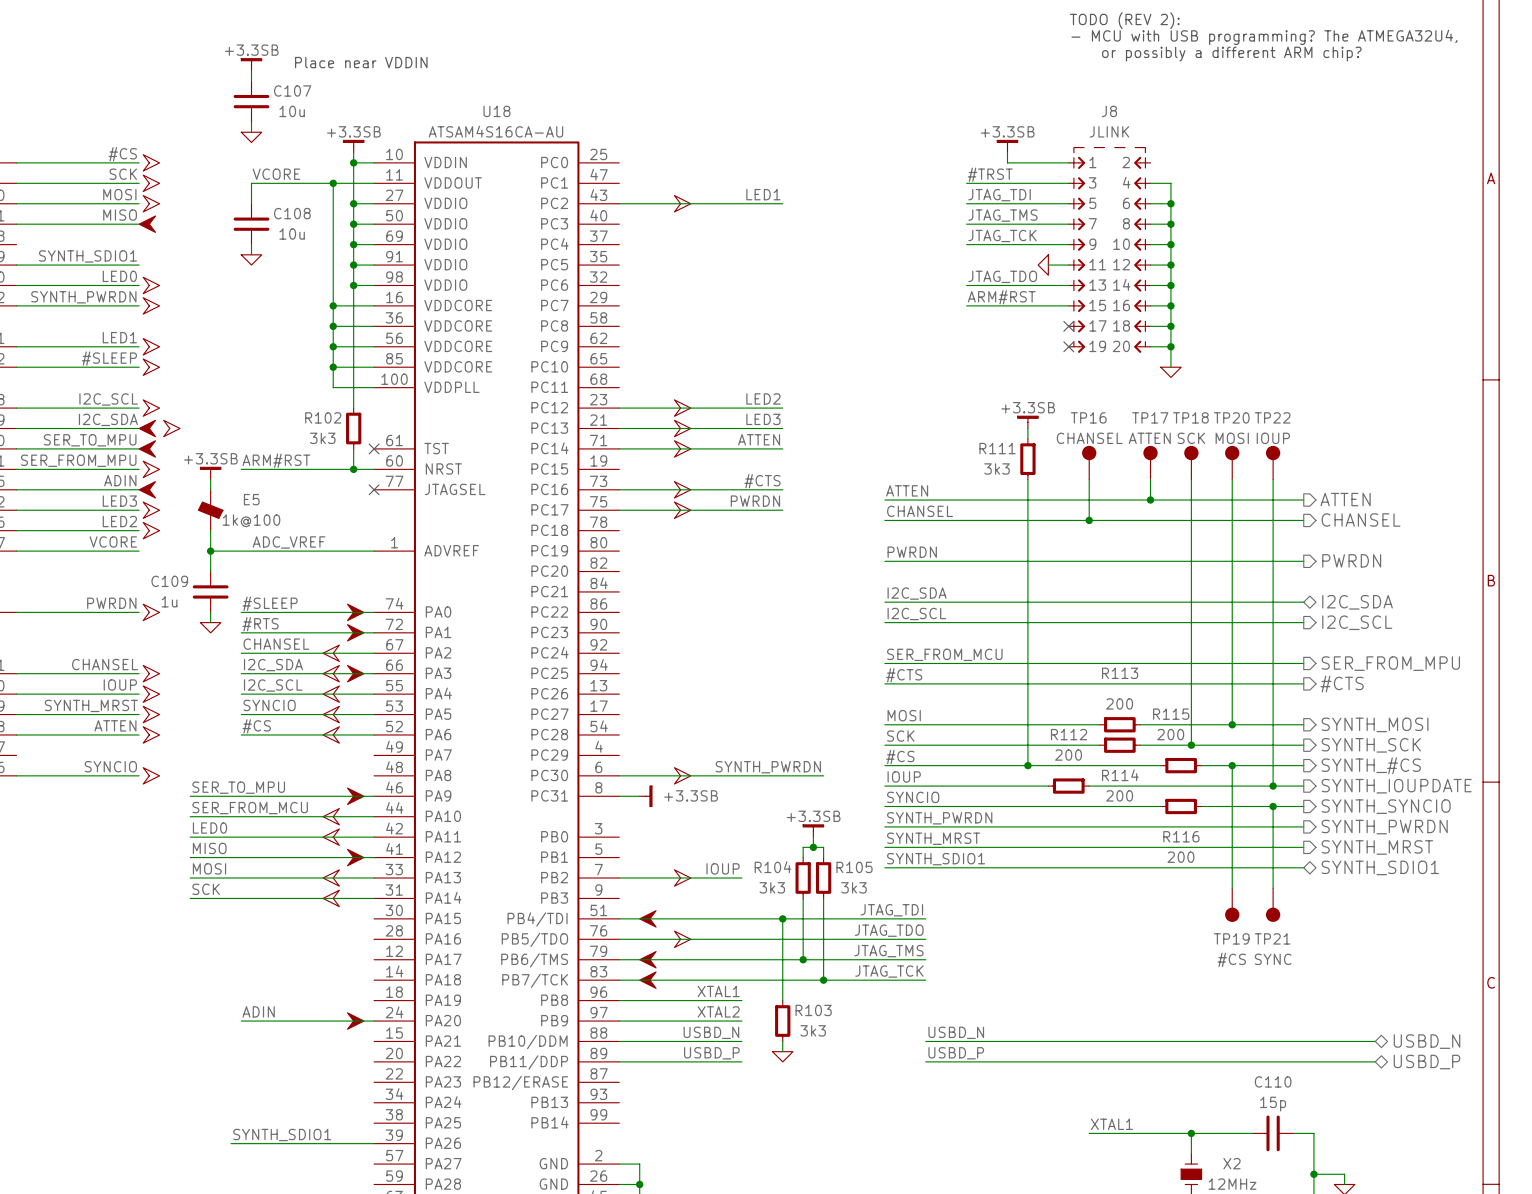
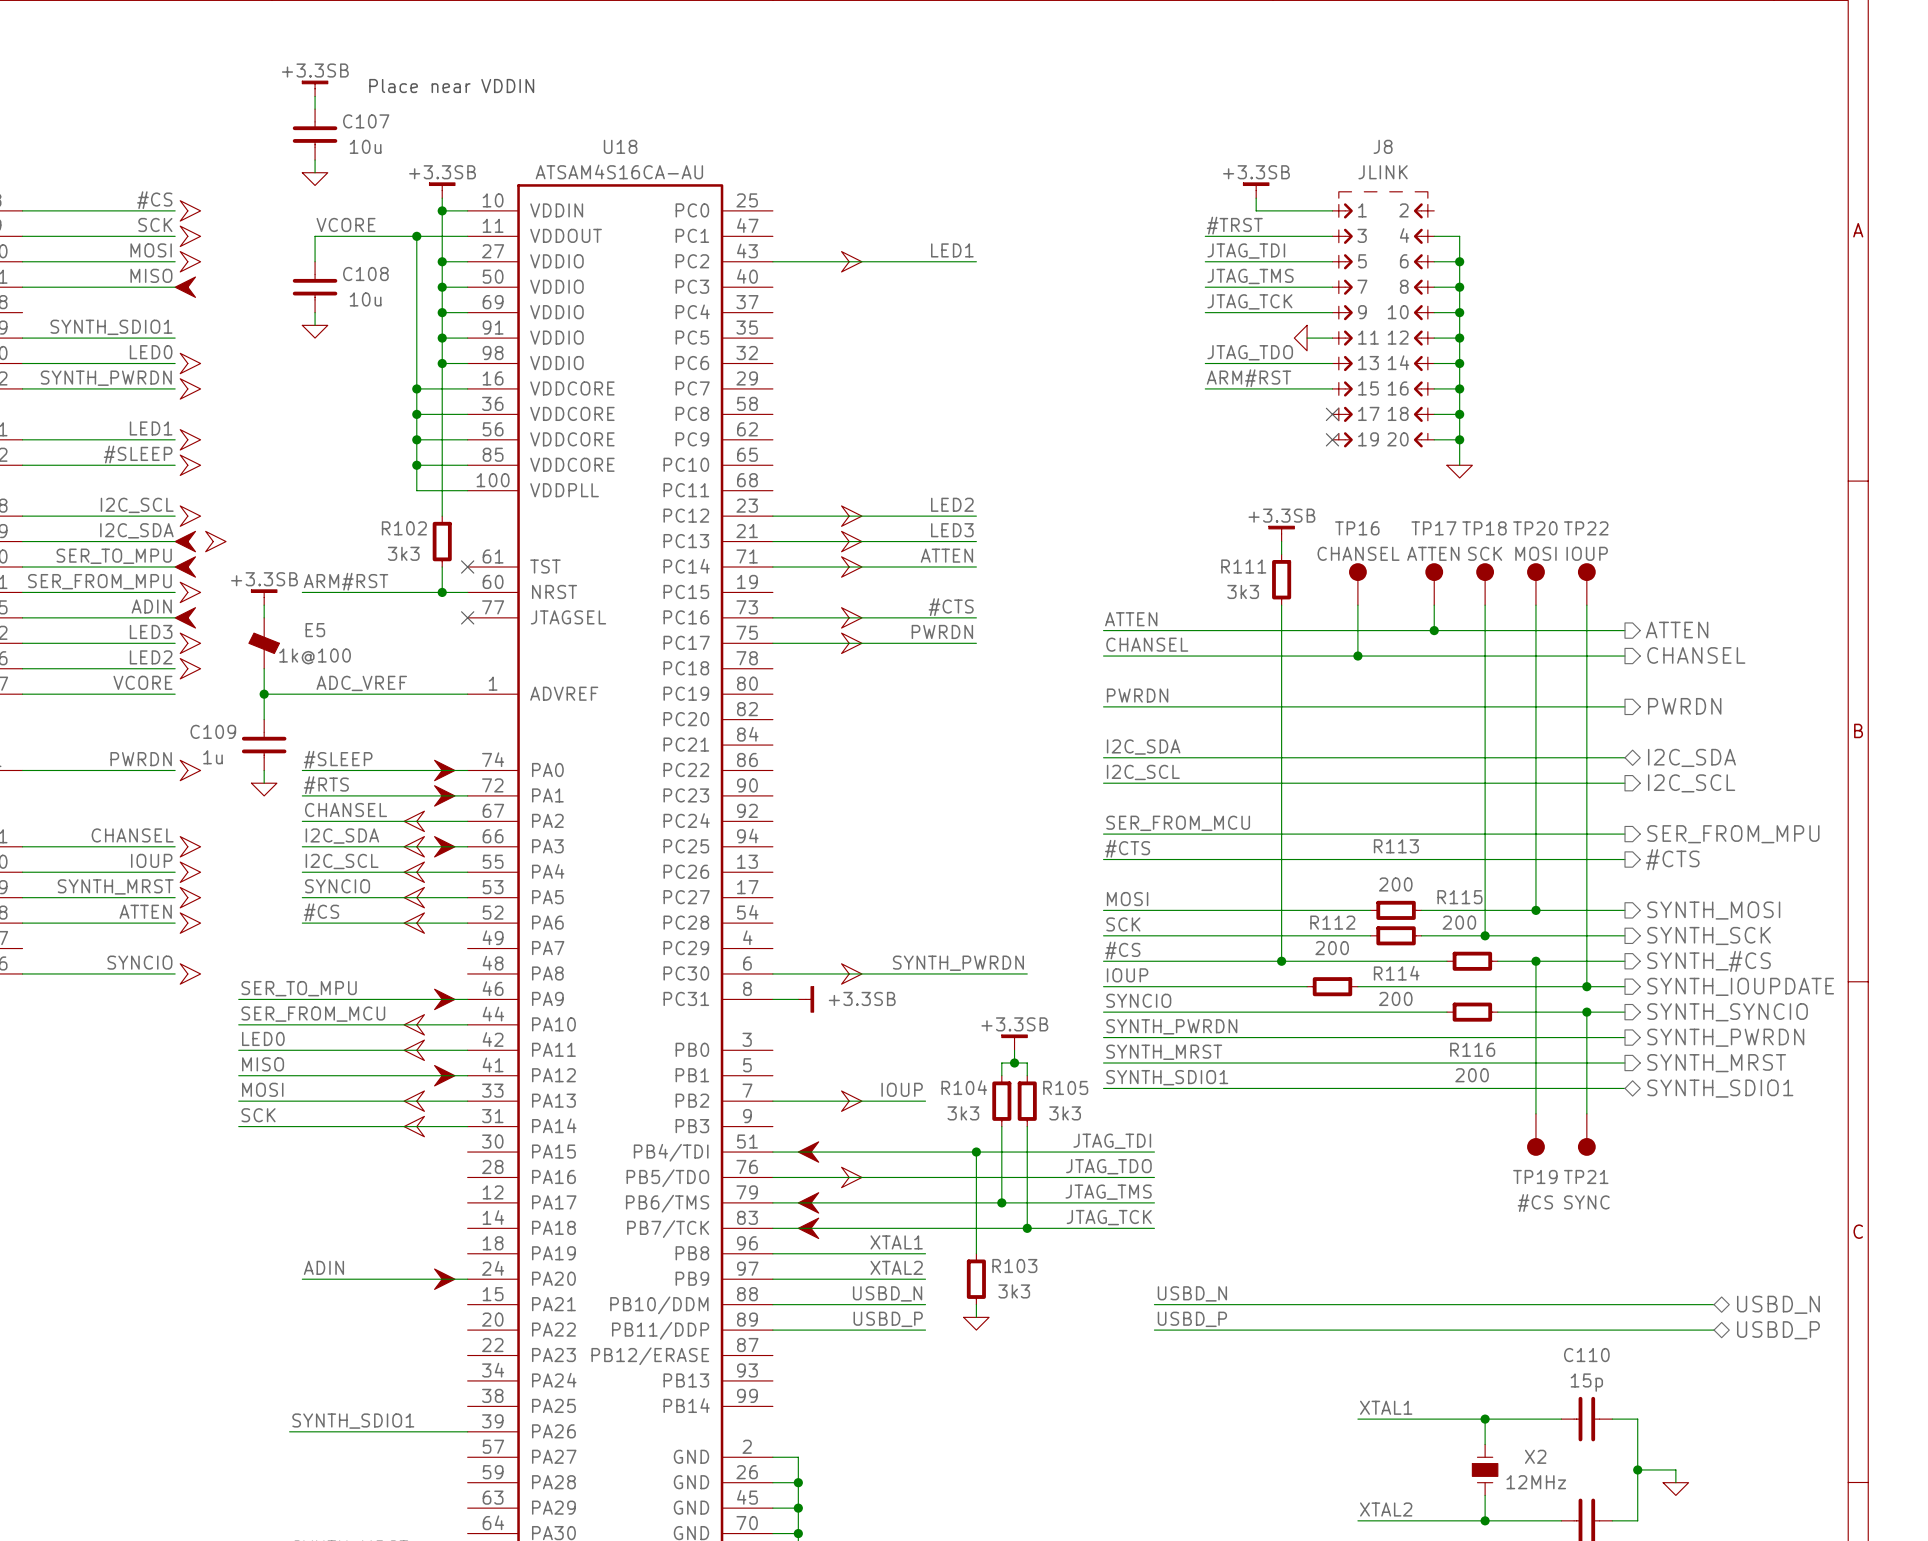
text: TODO (REV 2): (1124, 20) -> none
text: - MCU with USB programming? The ATMEGA32U4, (1264, 37) -> none
text: or possibly a different ARM chip? (1231, 54) -> none

